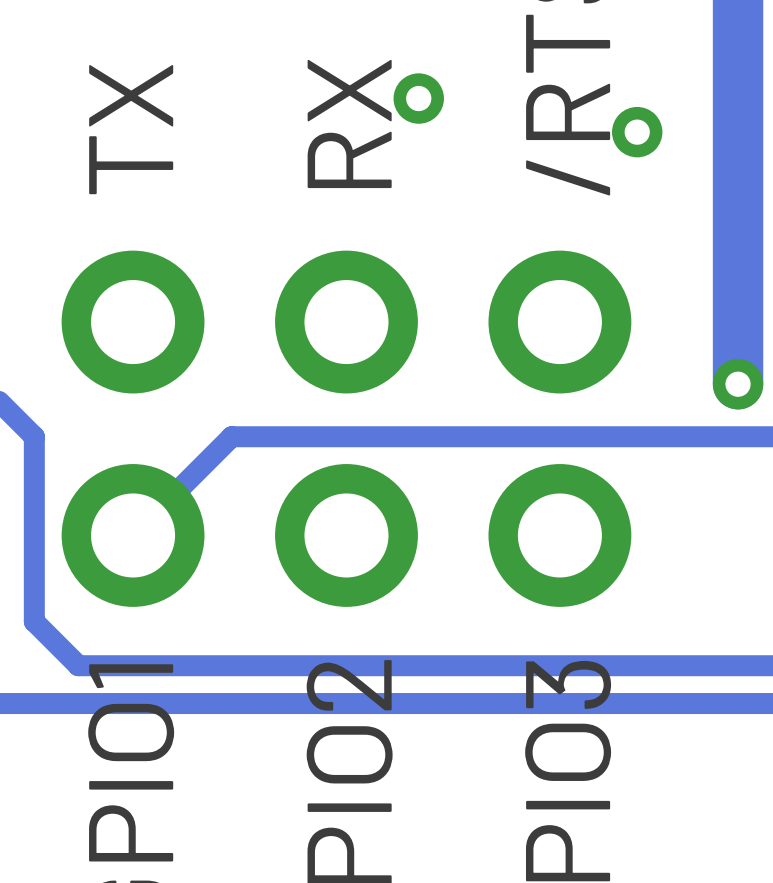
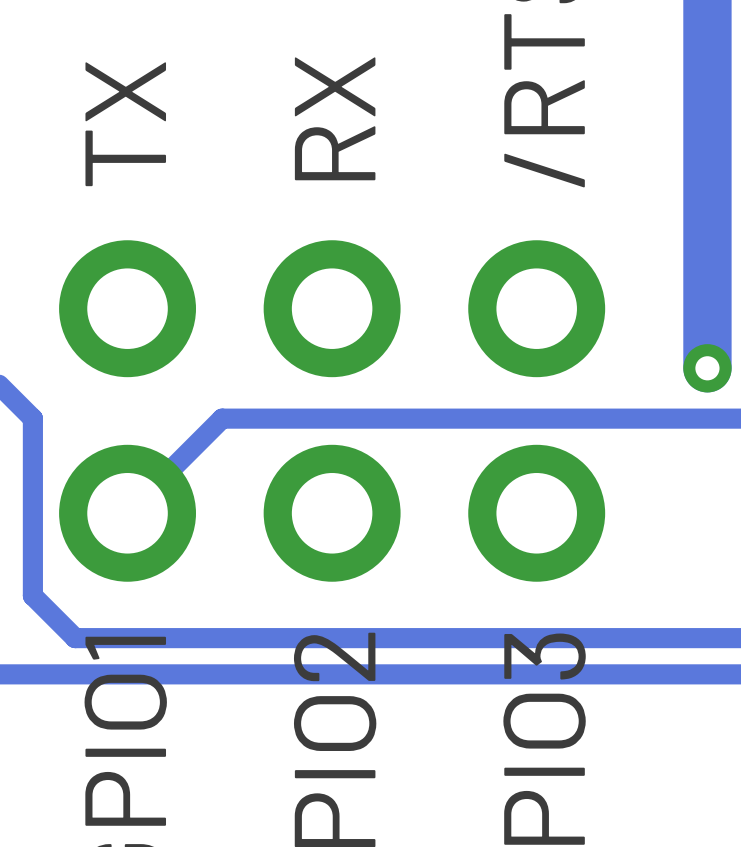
via: (418, 98) -> none
via: (637, 132) -> none

